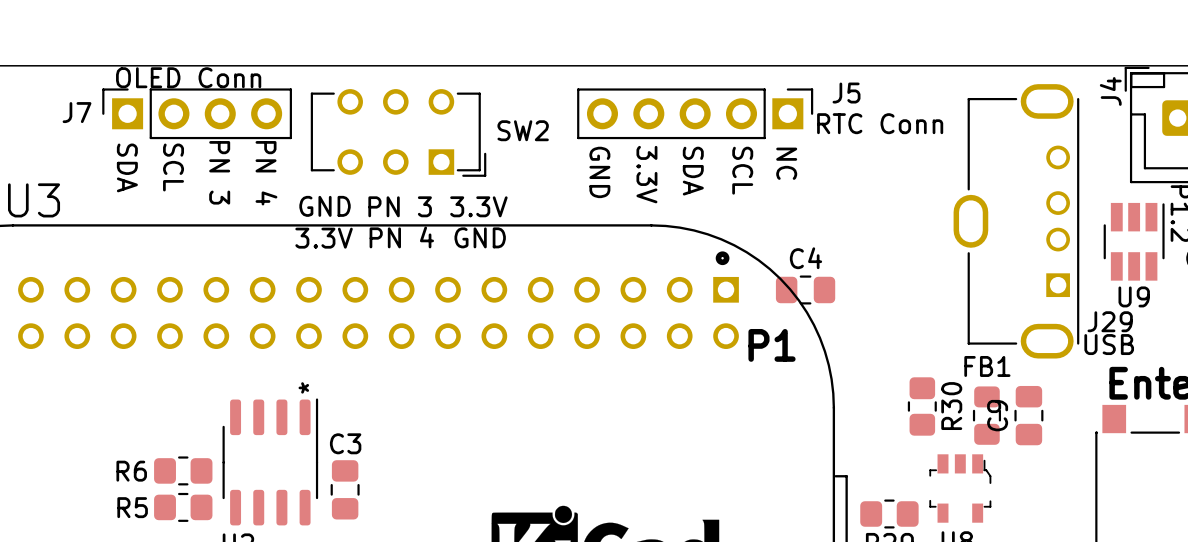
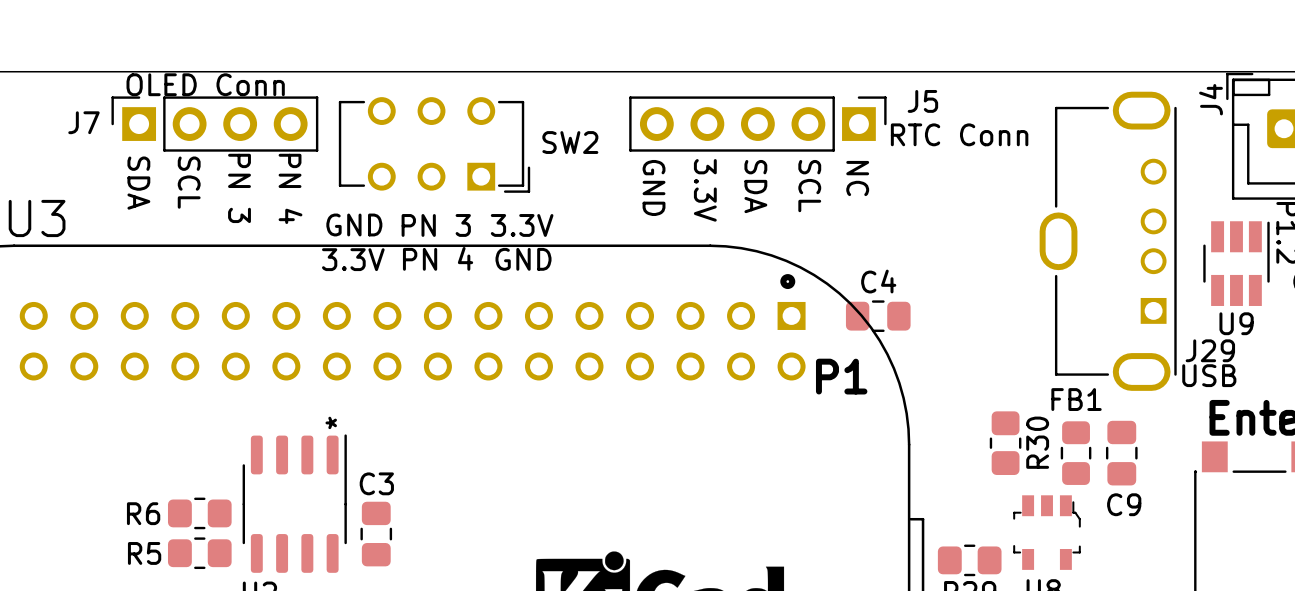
C9 name rotation: 0° (997, 415) -> 90° clockwise (1124, 504)
C9 name position: C9 (997, 415) -> C9 (1124, 504)

